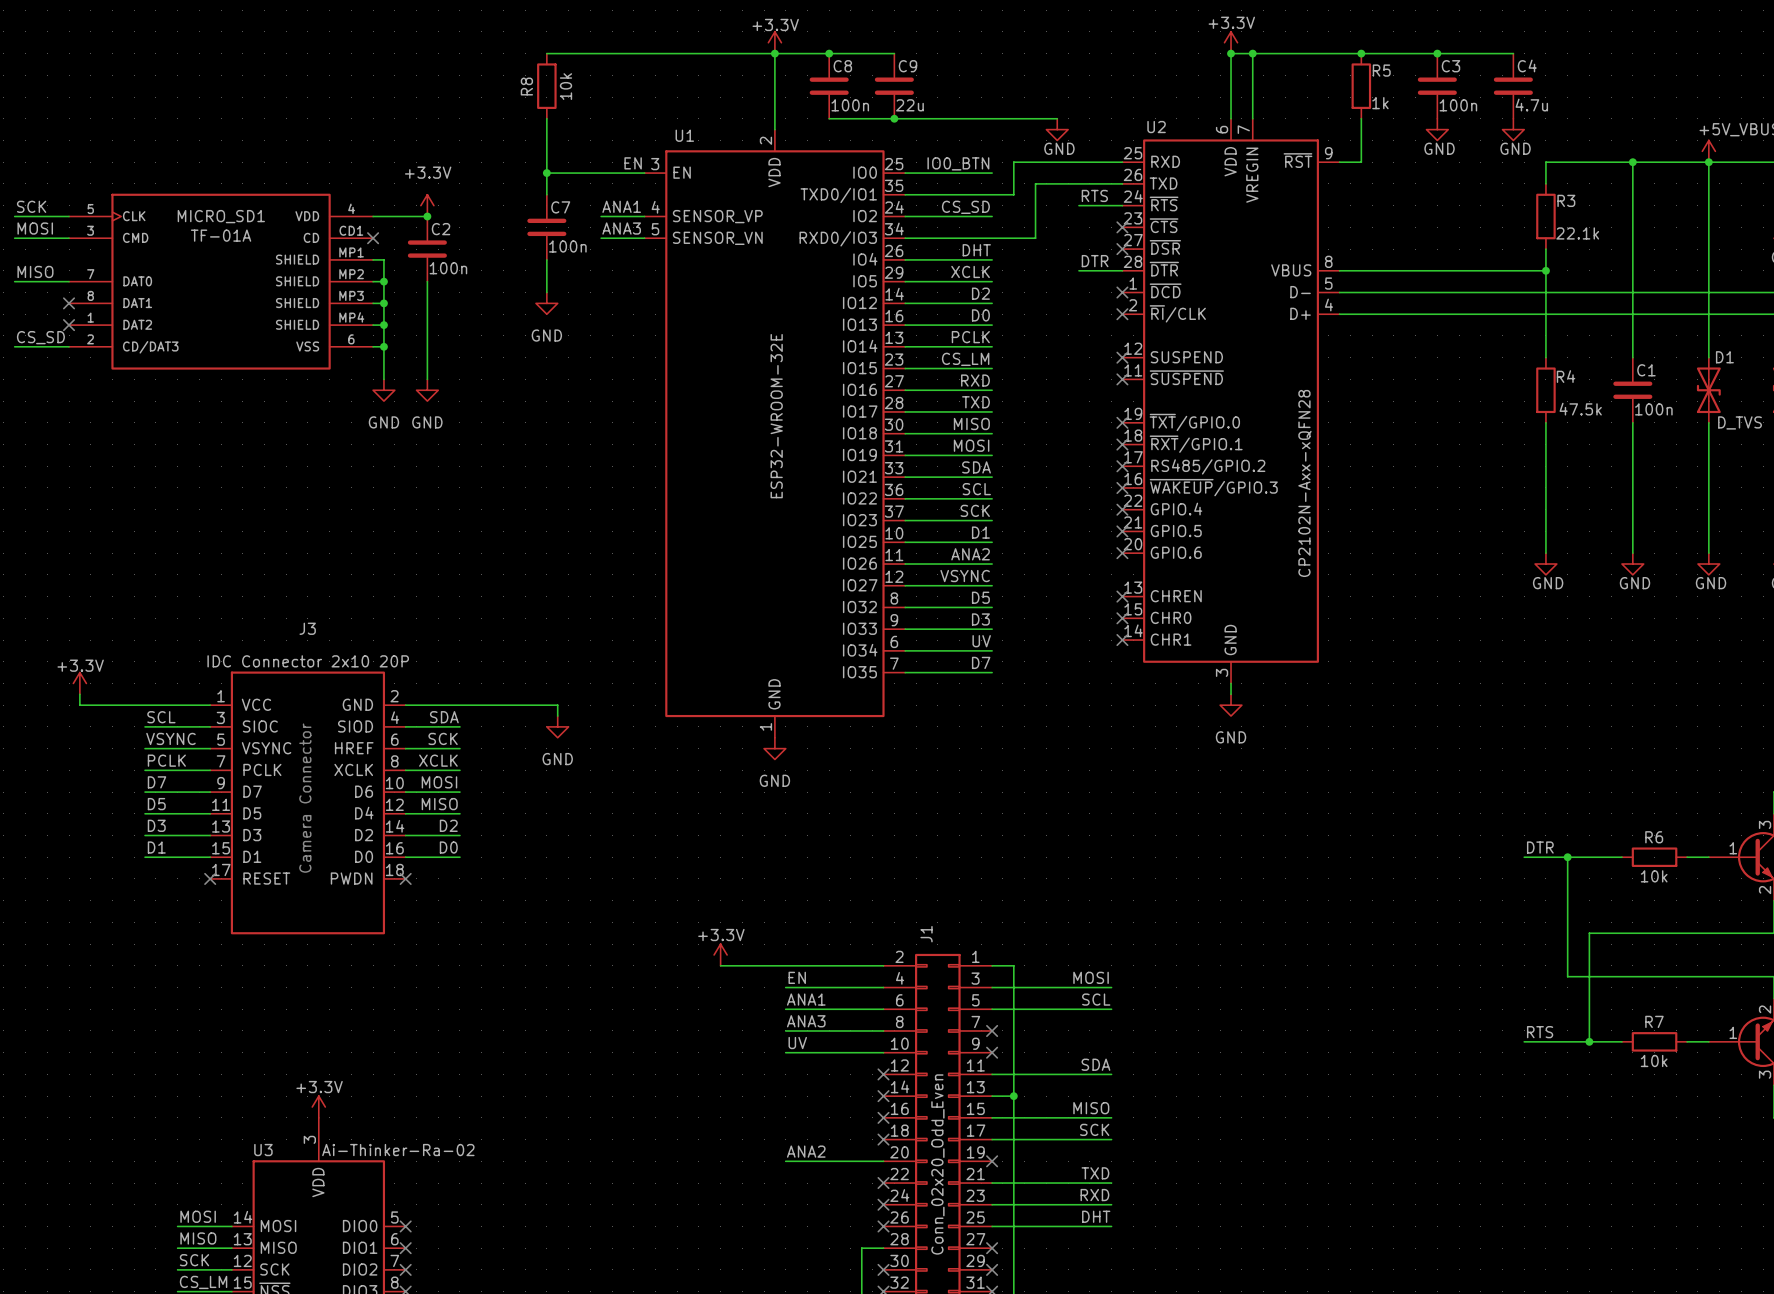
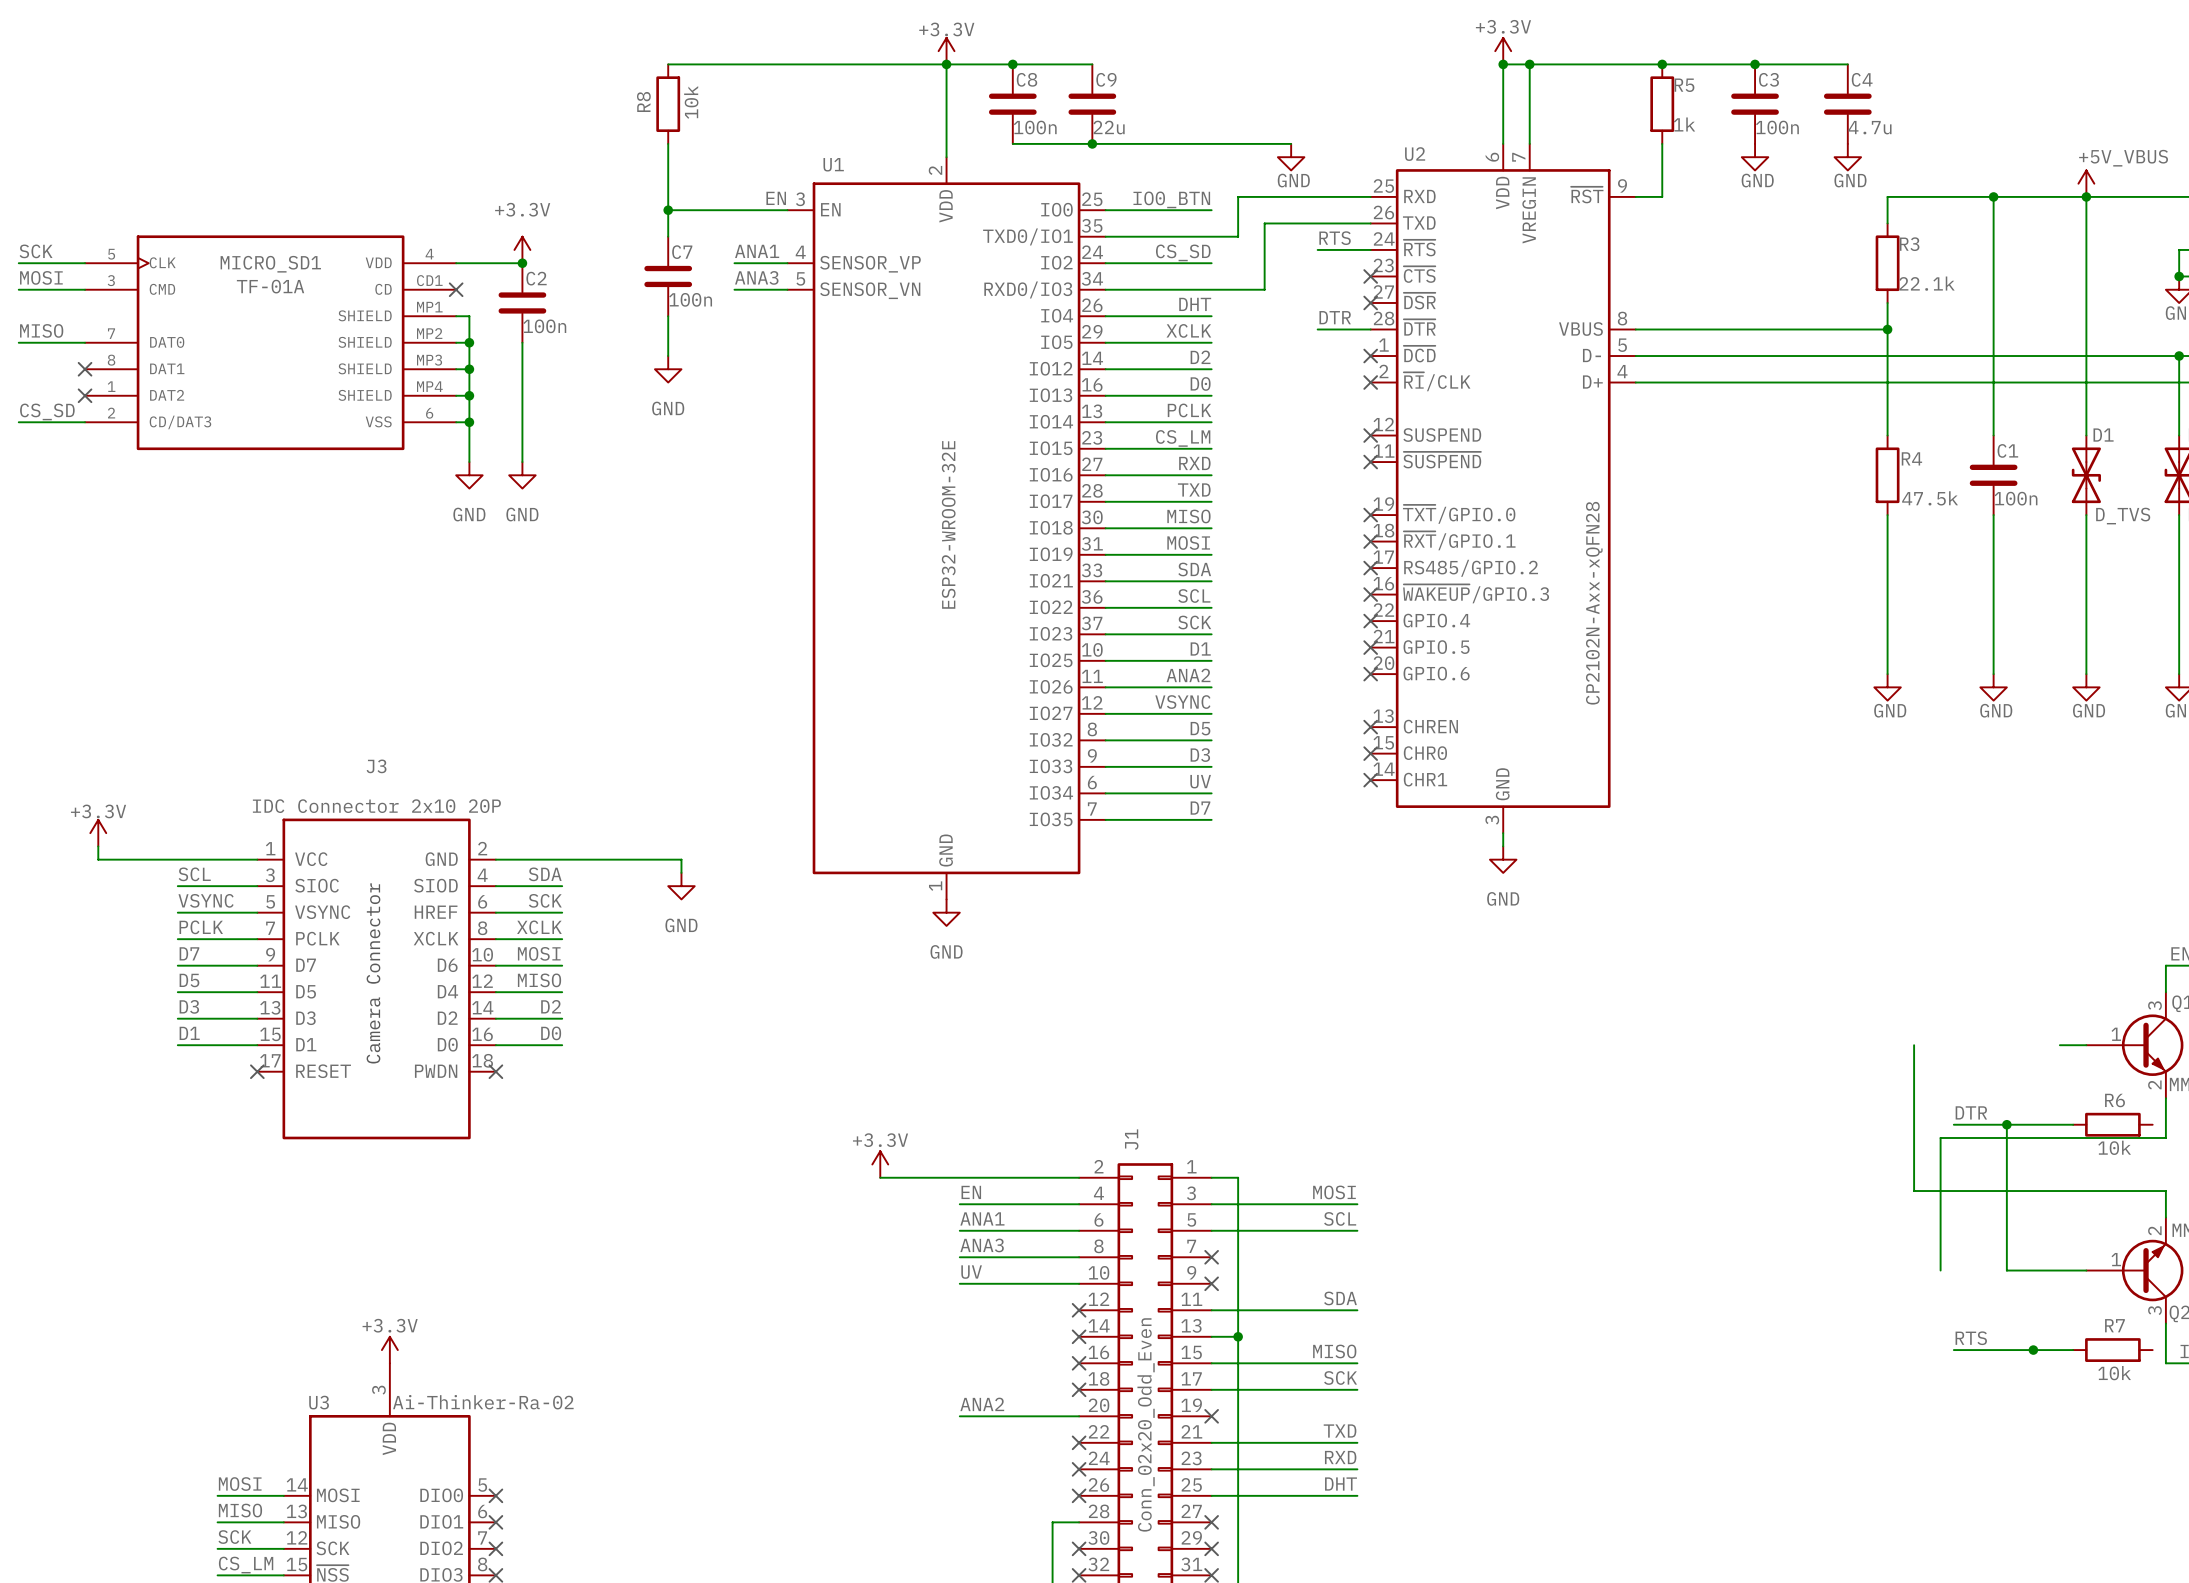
label position: DTR (1540, 847) -> DTR (1971, 1112)
wire: (1524, 857) (1621, 857) -> (1953, 1124) (2073, 1124)
junction: (1567, 857) -> none
R6 position: (1654, 857) -> (2112, 1124)
wire: none -> (2006, 1124) (2006, 1270) (2059, 1270)
junction: none -> (2006, 1124)
label position: RTS (1540, 1032) -> RTS (1971, 1338)
wire: (1524, 1041) (1621, 1041) -> (1953, 1350) (2073, 1350)
junction: (1589, 1041) -> none
R7 position: (1654, 1041) -> (2112, 1350)
junction: none -> (2033, 1350)

